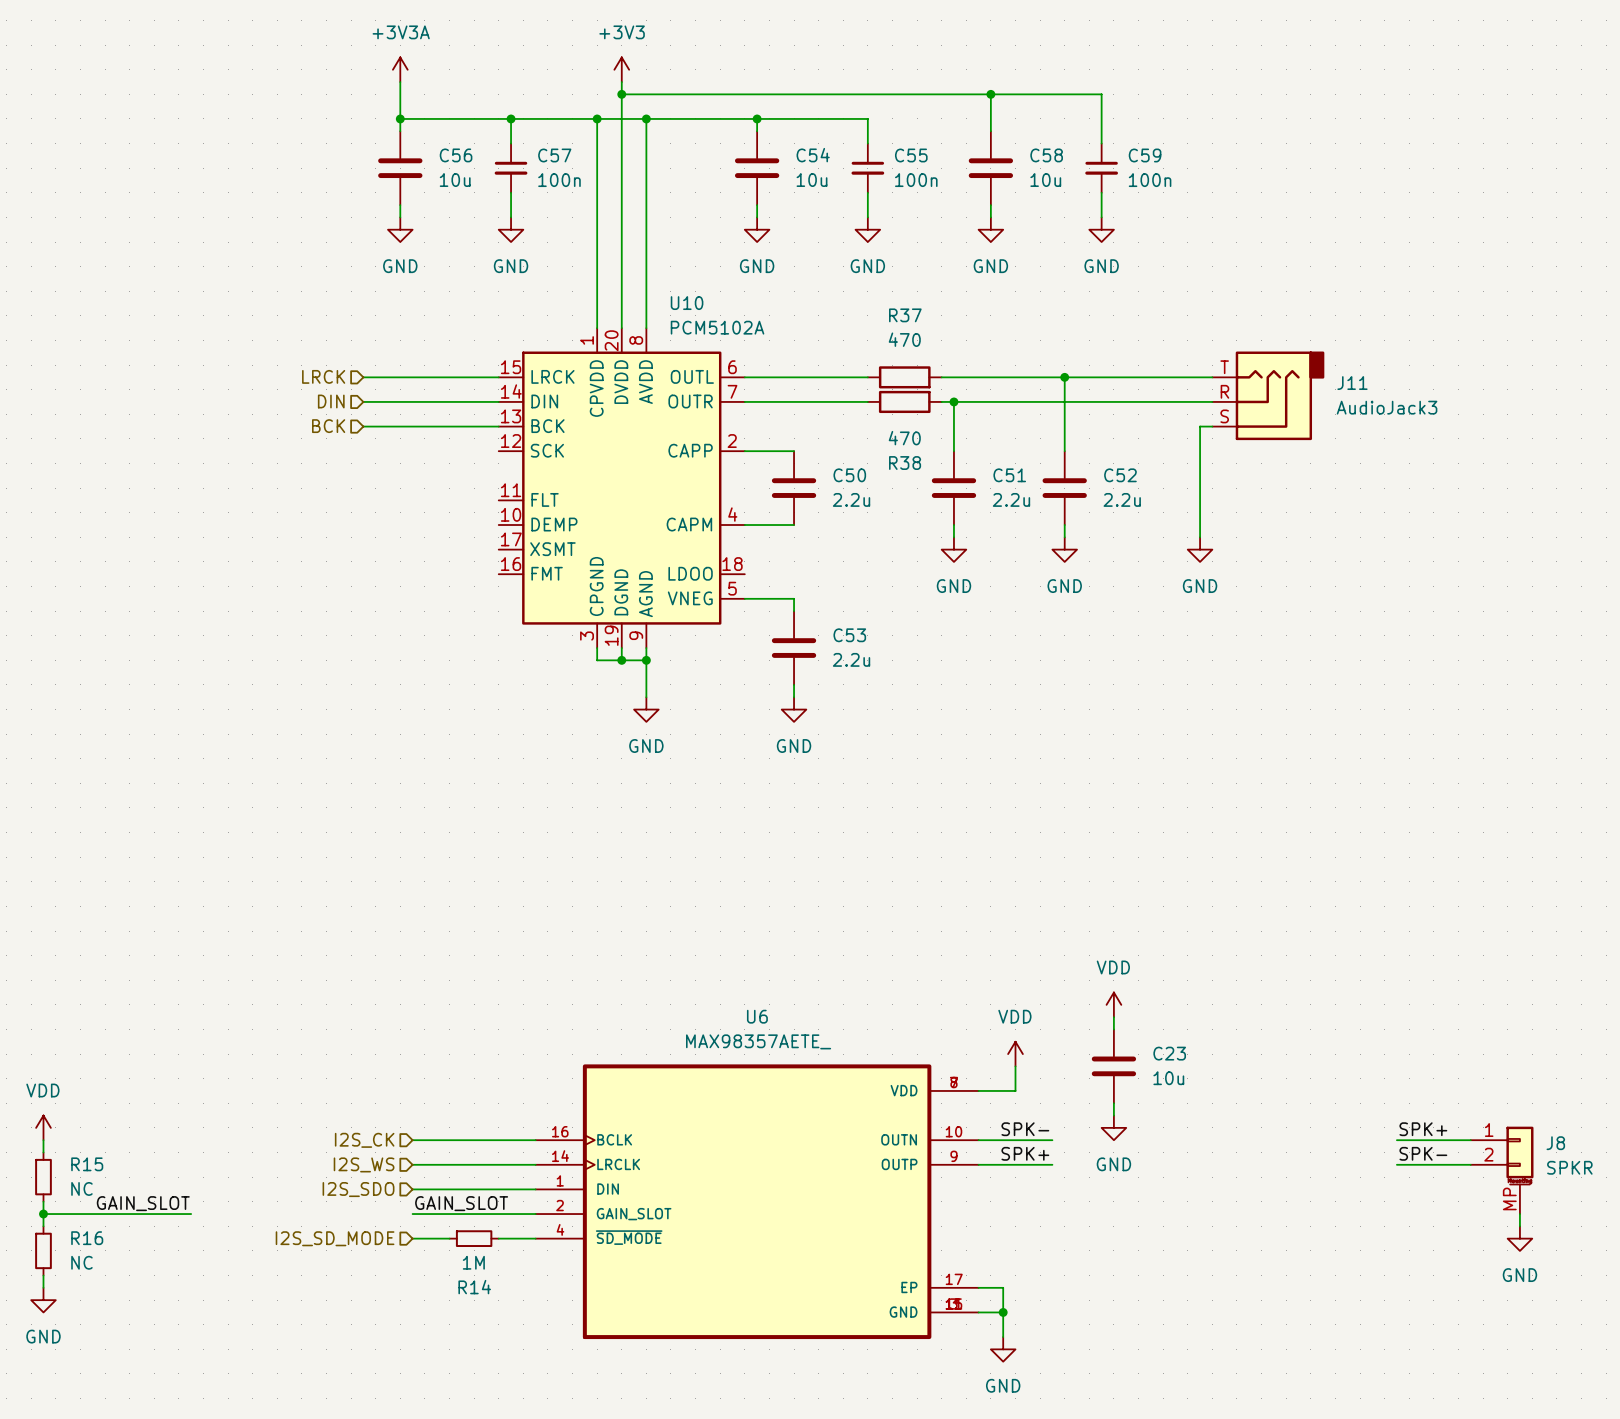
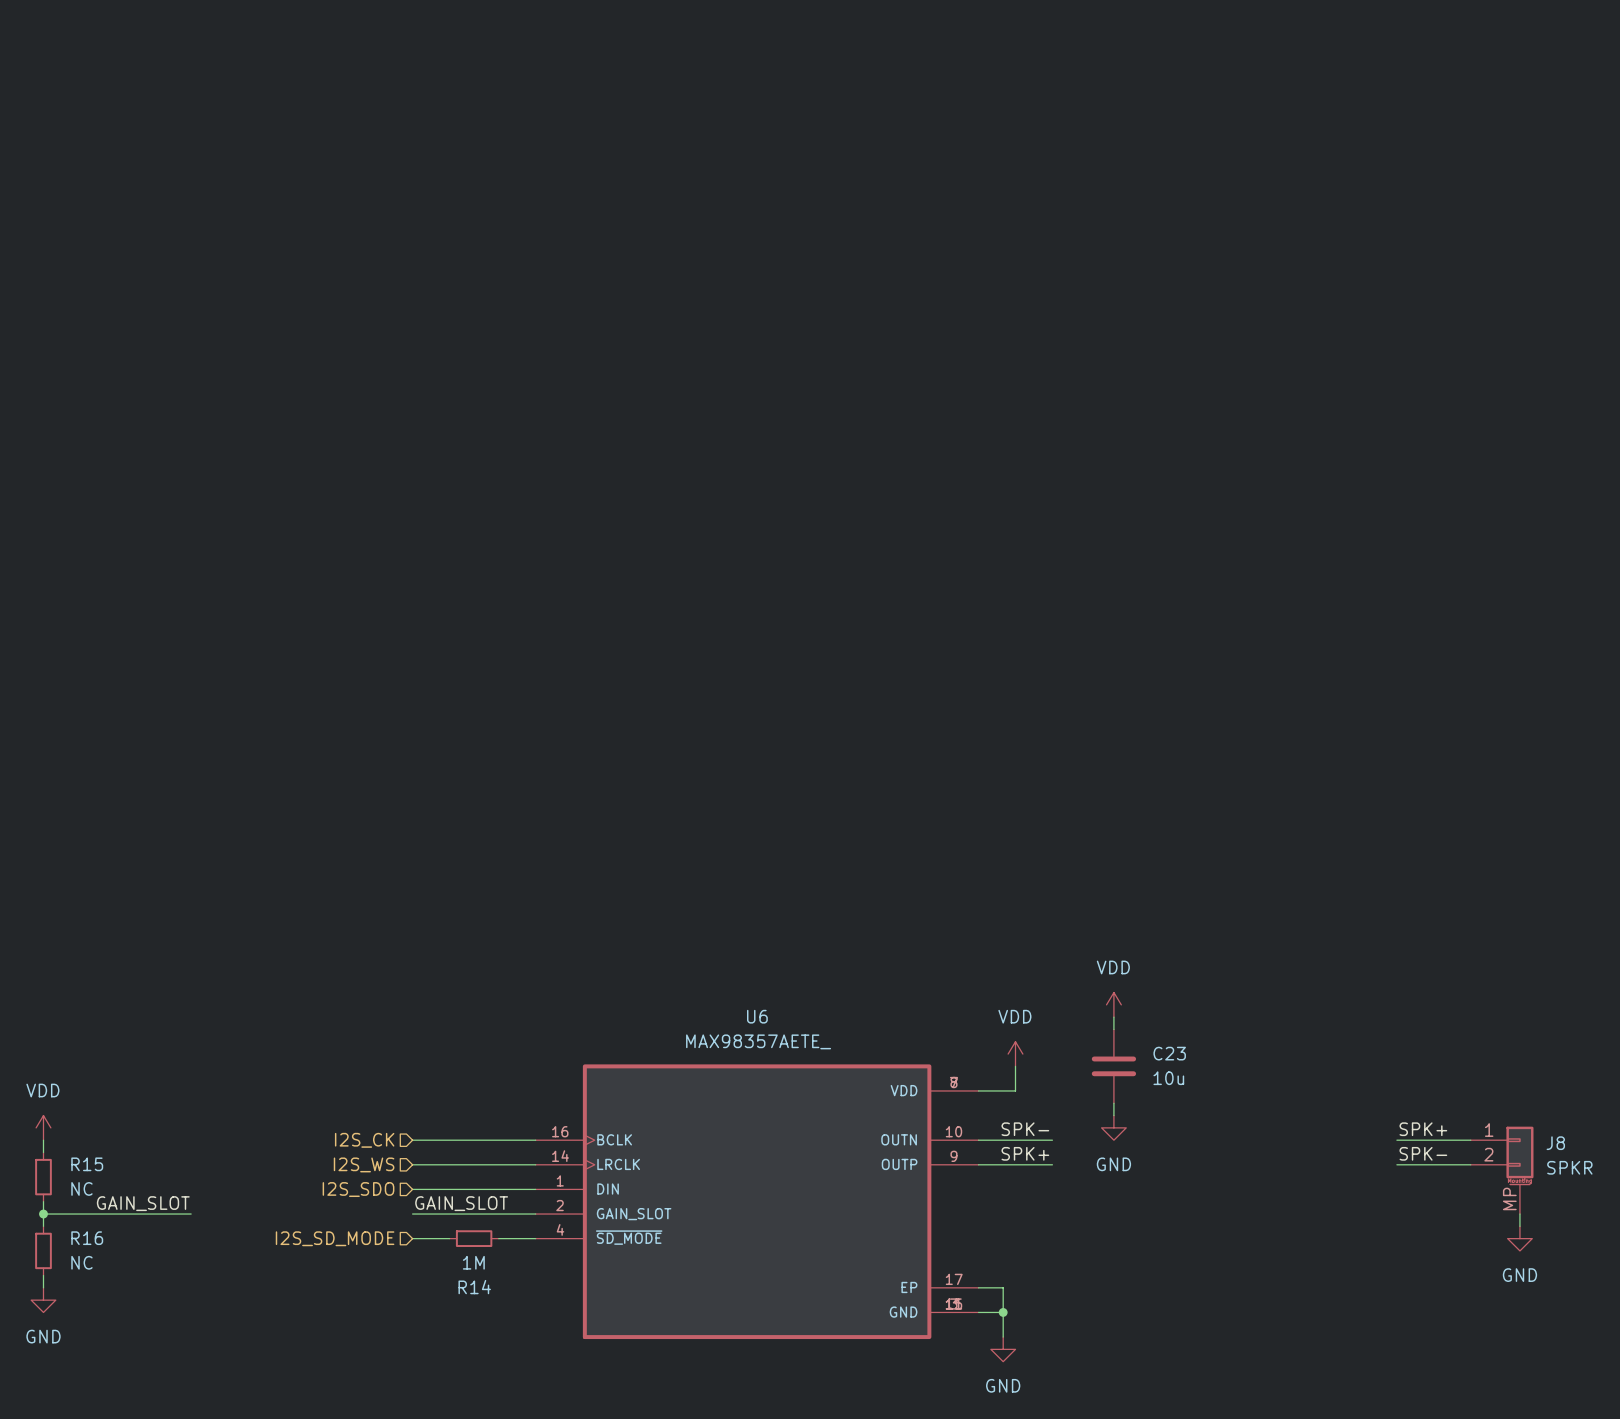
power symbol: +3V3A (400, 69) -> none
power symbol: +3V3 (621, 69) -> none
wire: (400, 82) (400, 131) -> none
wire: (621, 82) (621, 328) -> none
wire: (621, 94) (1101, 94) (1101, 143) -> none
junction: (621, 94) -> none
wire: (990, 94) (990, 131) -> none
junction: (990, 94) -> none
wire: (400, 118) (867, 118) (867, 143) -> none
junction: (400, 118) -> none
wire: (511, 118) (511, 143) -> none
junction: (511, 118) -> none
wire: (597, 118) (597, 328) -> none
junction: (597, 118) -> none
wire: (646, 118) (646, 328) -> none
junction: (646, 118) -> none
wire: (757, 118) (757, 131) -> none
junction: (757, 118) -> none
C56: 10u (400, 168) -> none
C57: 100n (511, 168) -> none
C54: 10u (757, 168) -> none
C55: 100n (867, 168) -> none
C58: 10u (990, 168) -> none
C59: 100n (1101, 168) -> none
wire: (511, 192) (511, 217) -> none
wire: (867, 192) (867, 217) -> none
wire: (1101, 192) (1101, 217) -> none
wire: (400, 205) (400, 217) -> none
wire: (757, 205) (757, 217) -> none
wire: (990, 205) (990, 217) -> none
power symbol: GND (400, 229) -> none
power symbol: GND (511, 229) -> none
power symbol: GND (757, 229) -> none
power symbol: GND (867, 229) -> none
power symbol: GND (990, 229) -> none
power symbol: GND (1101, 229) -> none
hierarchical label: LRCK (323, 376) -> none
wire: (363, 377) (498, 377) -> none
wire: (744, 377) (867, 377) -> none
R37: 470 (904, 377) -> none
wire: (941, 377) (1212, 377) -> none
wire: (1064, 377) (1064, 451) -> none
junction: (1064, 377) -> none
J11: AudioJack3 (1268, 395) -> none
hierarchical label: DIN (331, 401) -> none
wire: (363, 401) (498, 401) -> none
wire: (744, 401) (867, 401) -> none
R38: 470 (904, 401) -> none
wire: (941, 401) (1212, 401) -> none
wire: (953, 401) (953, 451) -> none
junction: (953, 401) -> none
hierarchical label: BCK (328, 426) -> none
wire: (363, 426) (498, 426) -> none
wire: (1212, 426) (1200, 426) (1200, 537) -> none
wire: (744, 451) (794, 451) -> none
U10: PCM5102A (621, 488) -> none
C50: 2.2u (794, 488) -> none
C51: 2.2u (953, 488) -> none
C52: 2.2u (1064, 488) -> none
wire: (744, 525) (794, 525) -> none
wire: (953, 525) (953, 537) -> none
wire: (1064, 525) (1064, 537) -> none
power symbol: GND (953, 549) -> none
power symbol: GND (1064, 549) -> none
power symbol: GND (1200, 549) -> none
wire: (744, 598) (794, 598) (794, 611) -> none
wire: (597, 648) (597, 660) (646, 660) -> none
wire: (621, 648) (621, 660) -> none
wire: (646, 648) (646, 697) -> none
C53: 2.2u (794, 648) -> none
junction: (621, 660) -> none
junction: (646, 660) -> none
wire: (794, 684) (794, 697) -> none
power symbol: GND (646, 709) -> none
power symbol: GND (794, 709) -> none

